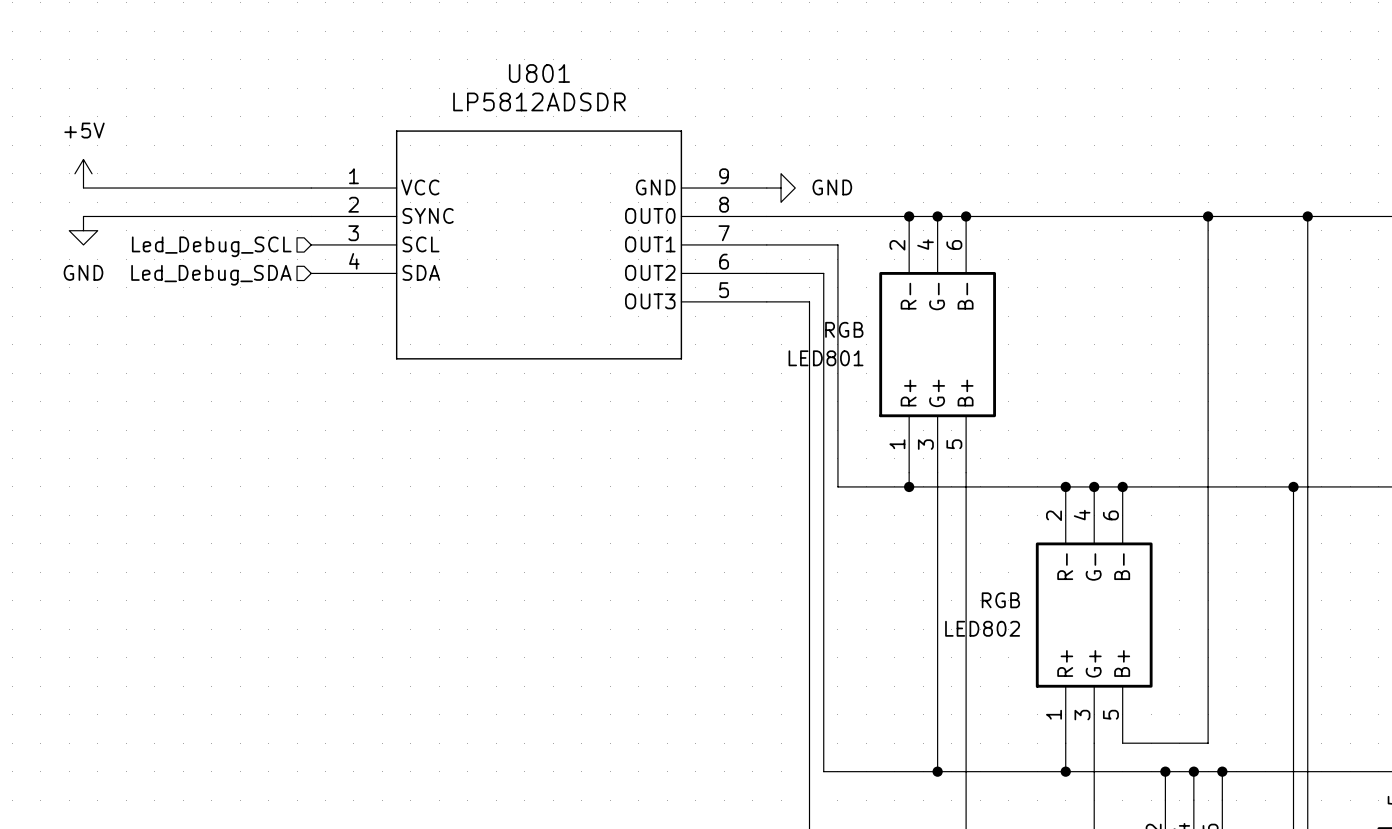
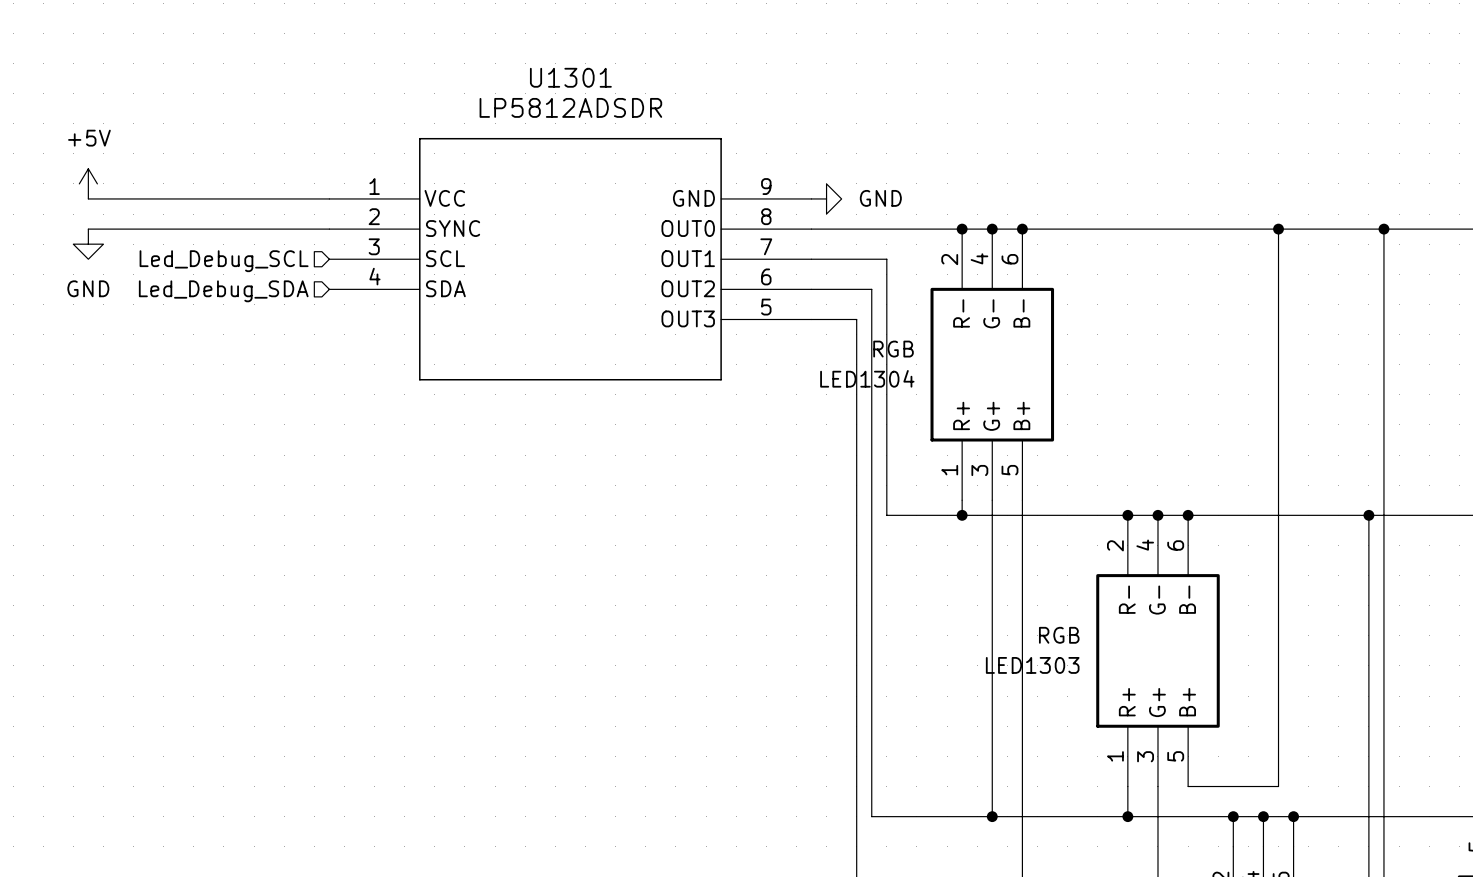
U801 name: U801 (539, 73) -> U1301 (570, 77)
LED801 name: LED801 (826, 358) -> LED1304 (867, 378)
LED802 name: LED802 (982, 628) -> LED1303 (1032, 665)

